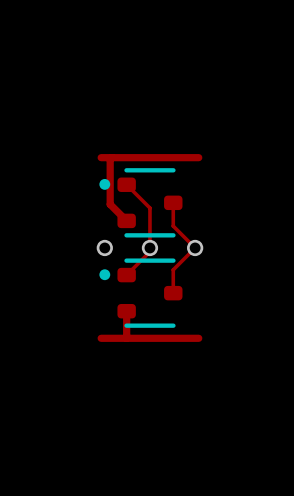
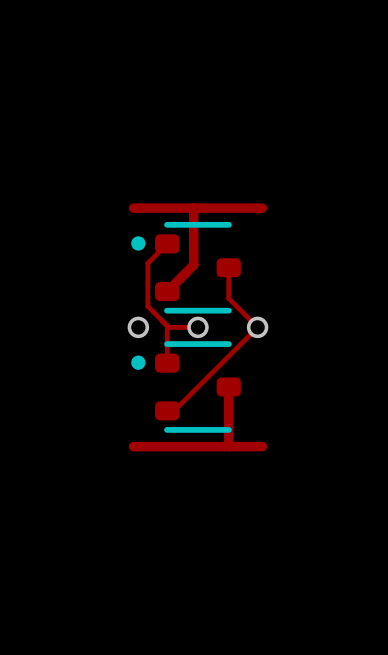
track: (112, 157) (110, 159) (110, 204) (126, 220) -> (193, 208) (193, 265) (167, 291)
track: (126, 184) (149, 208) (149, 251) (126, 275) -> (167, 243) (147, 263) (147, 306) (168, 327) (197, 327)
track: none -> (167, 325) (167, 363)
track: (173, 269) (173, 293) -> (228, 356) (174, 410) (167, 410)
track: none -> (228, 387) (228, 446)
track: (126, 311) (126, 338) -> none

